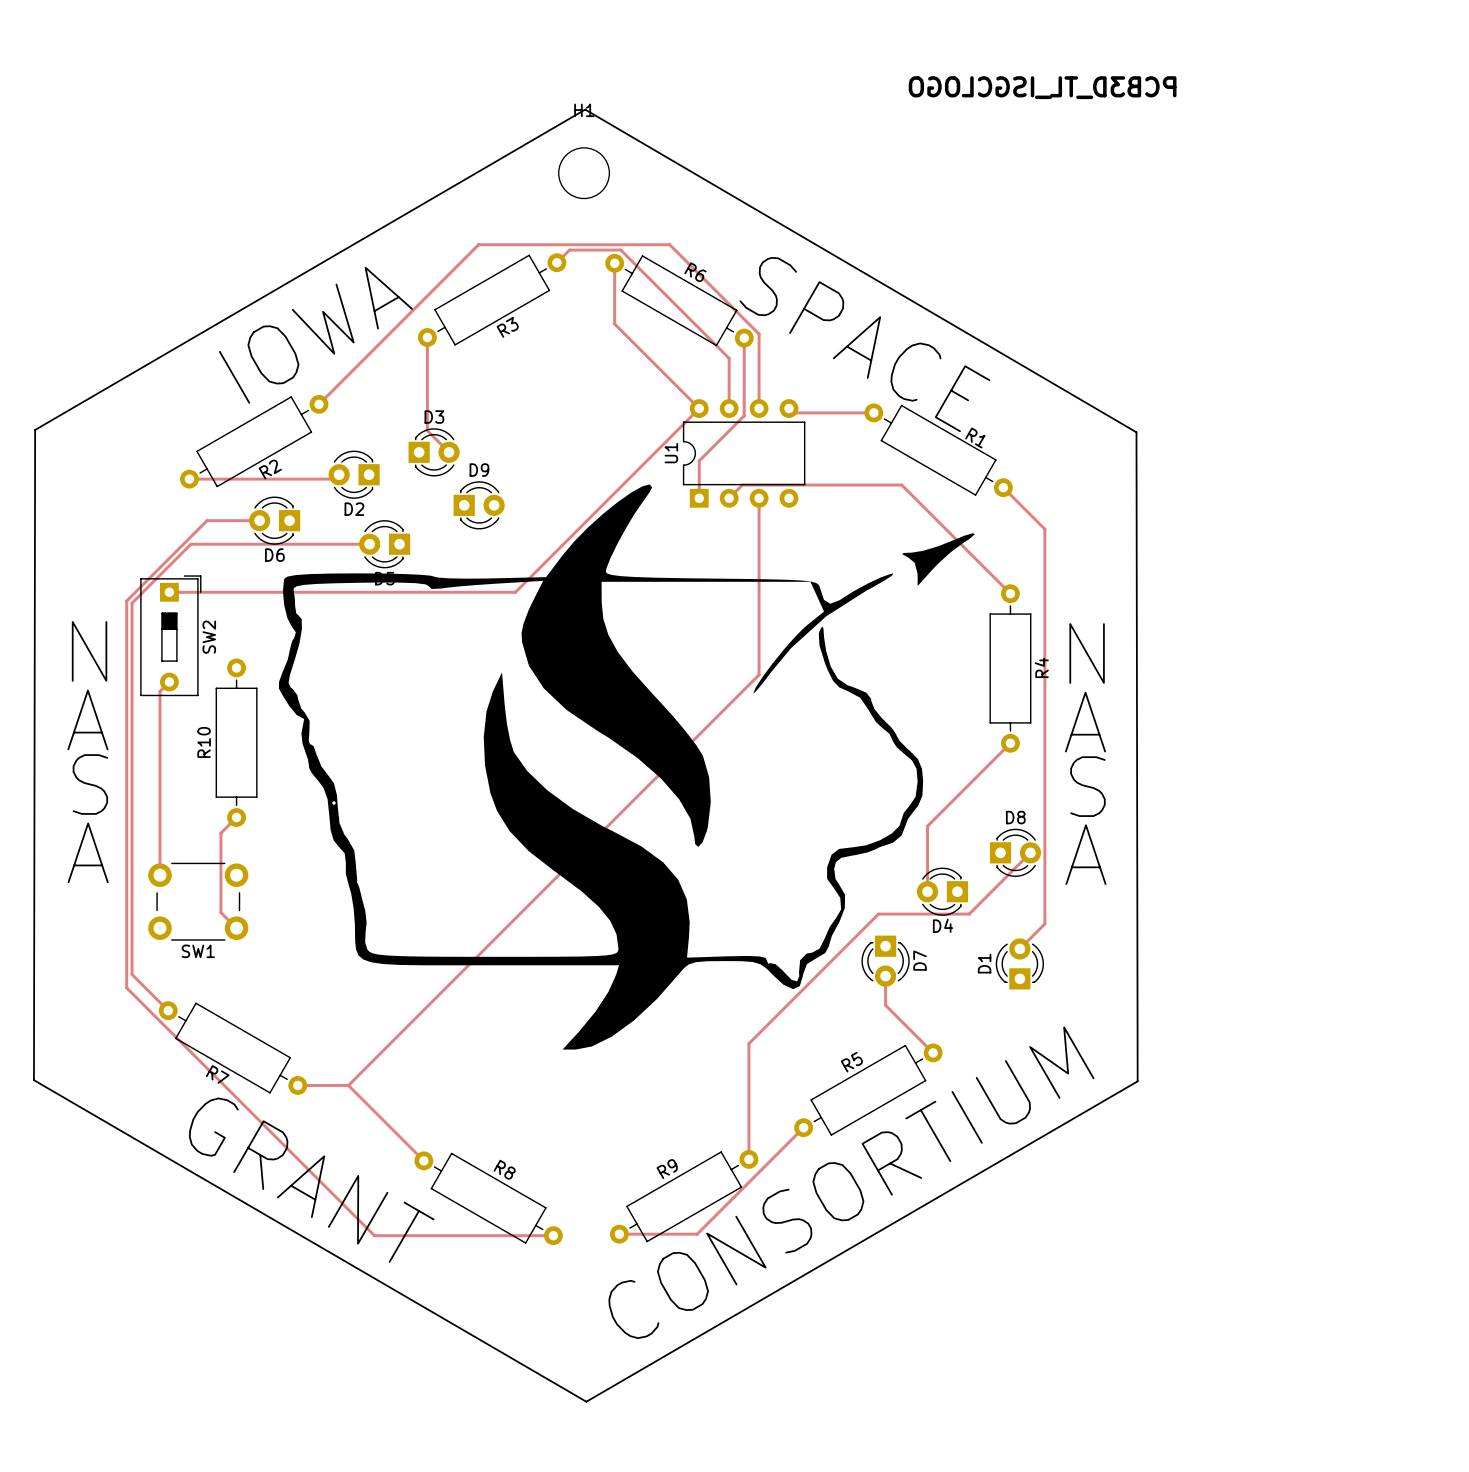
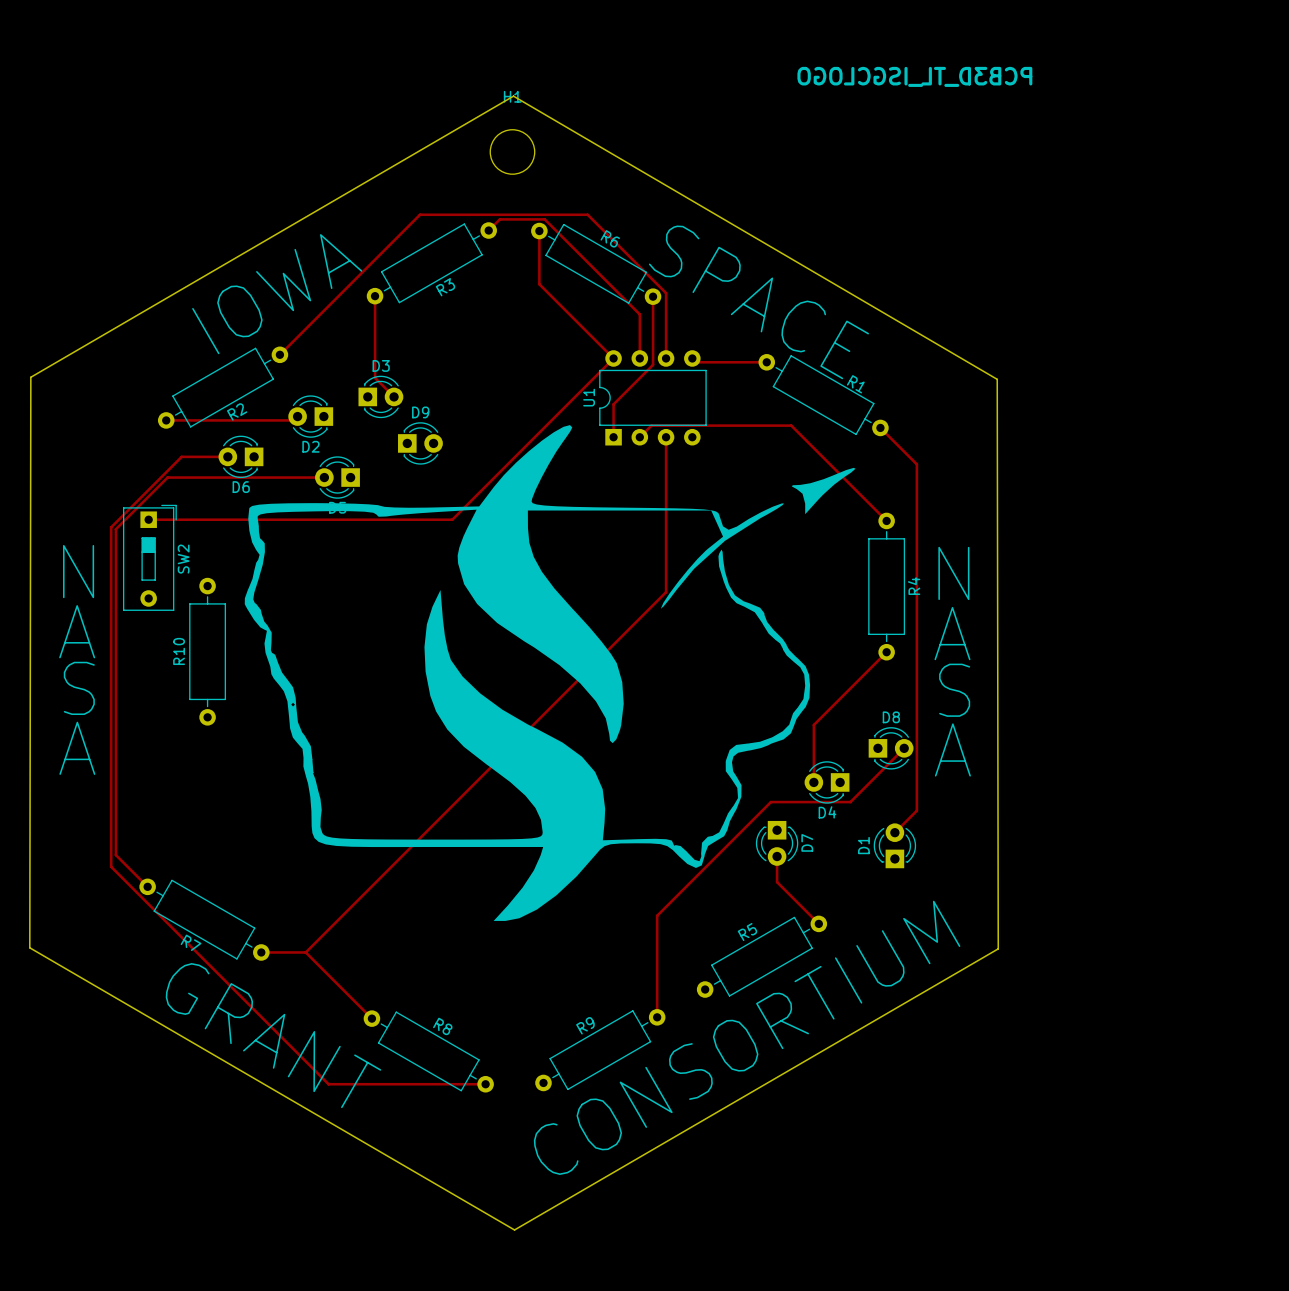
track: (169, 682) (160, 691) (160, 875) -> none
track: (236, 817) (220, 833) (220, 912) (236, 928) -> none
SW1: (198, 901) -> none
track: (803, 1127) (697, 1234) (619, 1234) -> none

